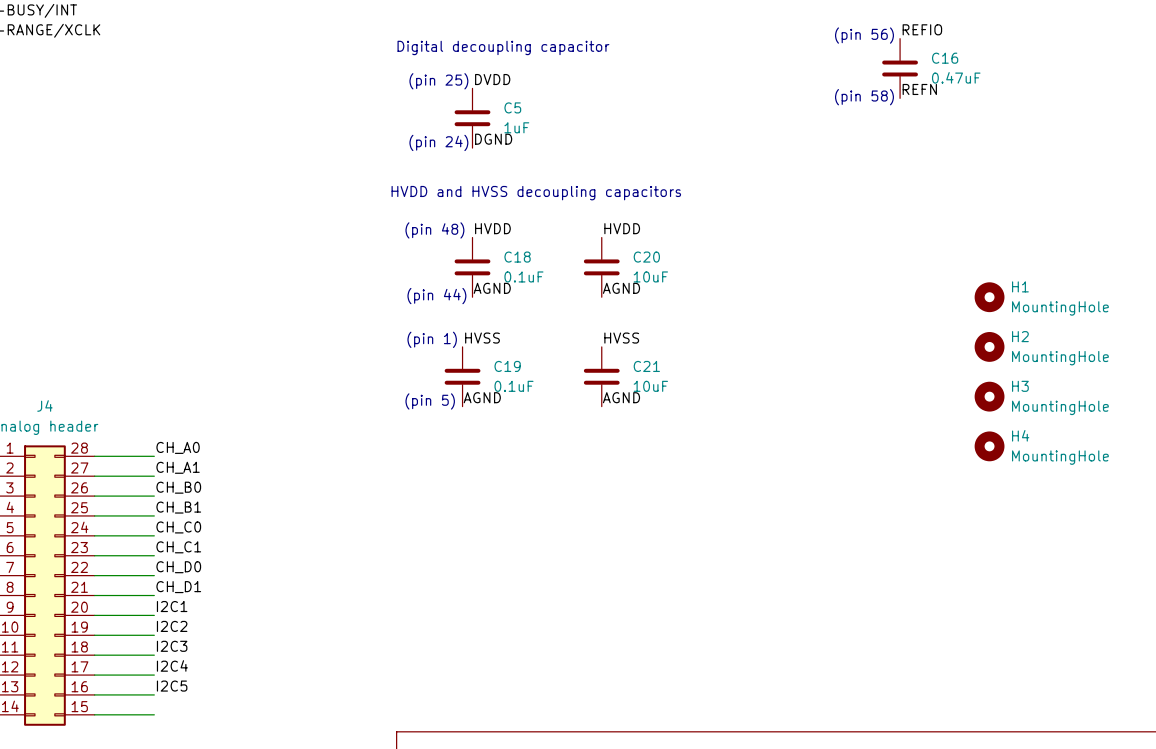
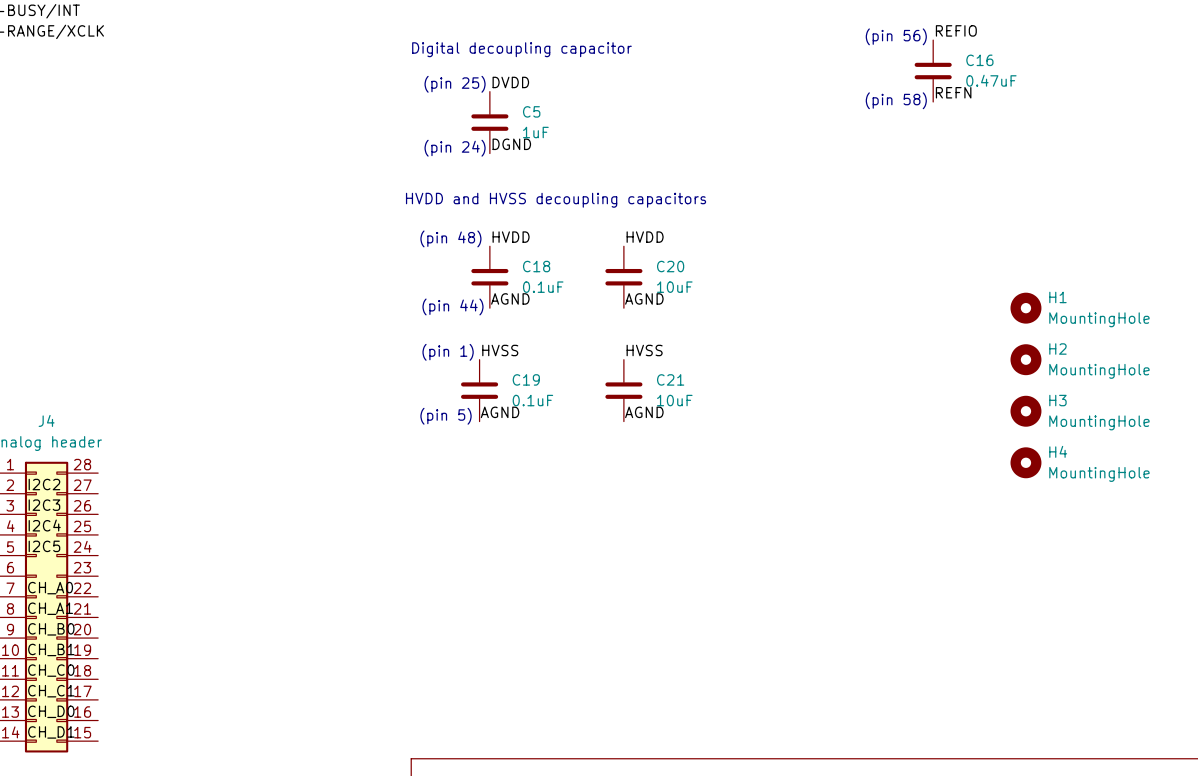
label position: CH_A0 (178, 447) -> CH_A0 (50, 588)
wire: (94, 456) (154, 456) -> none
label: none -> I2C2 (44, 484)
label position: CH_A1 (178, 467) -> CH_A1 (50, 608)
wire: (94, 476) (154, 476) -> none
label: none -> I2C3 (44, 505)
label position: CH_B0 (178, 487) -> CH_B0 (51, 629)
wire: (94, 496) (154, 496) -> none
label: none -> I2C4 (44, 525)
label position: CH_B1 (178, 507) -> CH_B1 (51, 649)
wire: (94, 515) (154, 515) -> none
label: none -> I2C5 (44, 546)
label position: CH_C0 (178, 527) -> CH_C0 (51, 670)
wire: (94, 535) (154, 535) -> none
label position: CH_C1 (178, 547) -> CH_C1 (51, 691)
wire: (94, 555) (154, 555) -> none
label position: CH_D0 (178, 567) -> CH_D0 (51, 711)
wire: (94, 575) (154, 575) -> none
label position: CH_D1 (178, 587) -> CH_D1 (51, 732)
wire: (94, 595) (154, 595) -> none
label: I2C1 (172, 606) -> none
wire: (94, 615) (154, 615) -> none
label: I2C2 (172, 626) -> none
wire: (94, 635) (154, 635) -> none
label: I2C3 (172, 646) -> none
wire: (94, 655) (154, 655) -> none
label: I2C4 (172, 665) -> none
wire: (94, 675) (154, 675) -> none
label: I2C5 (172, 686) -> none
wire: (94, 694) (154, 694) -> none
wire: (94, 714) (154, 714) -> none

